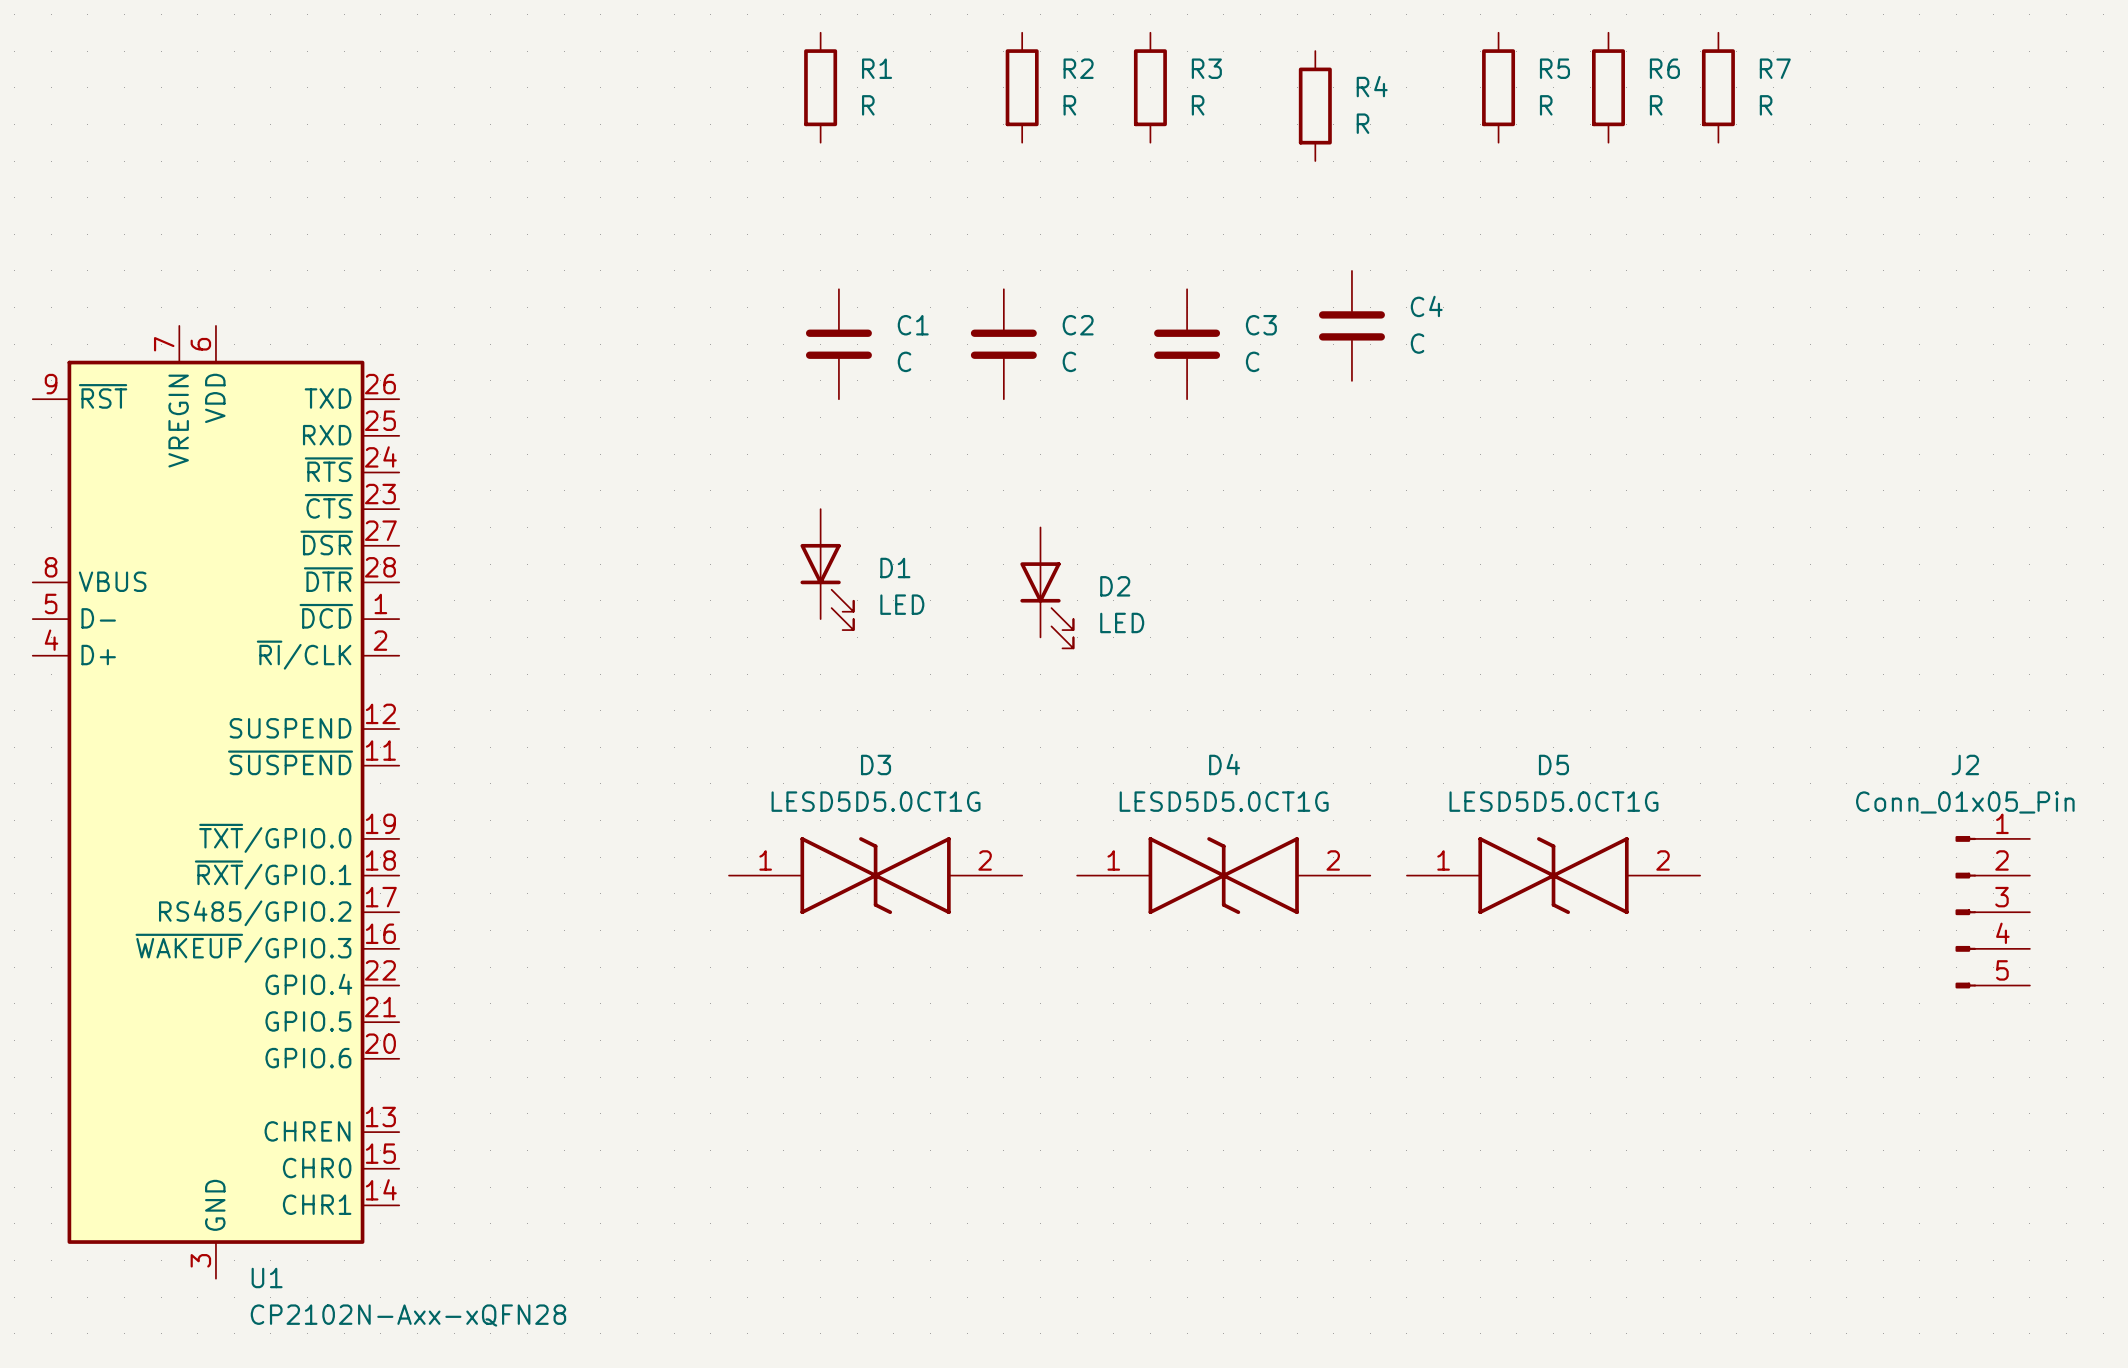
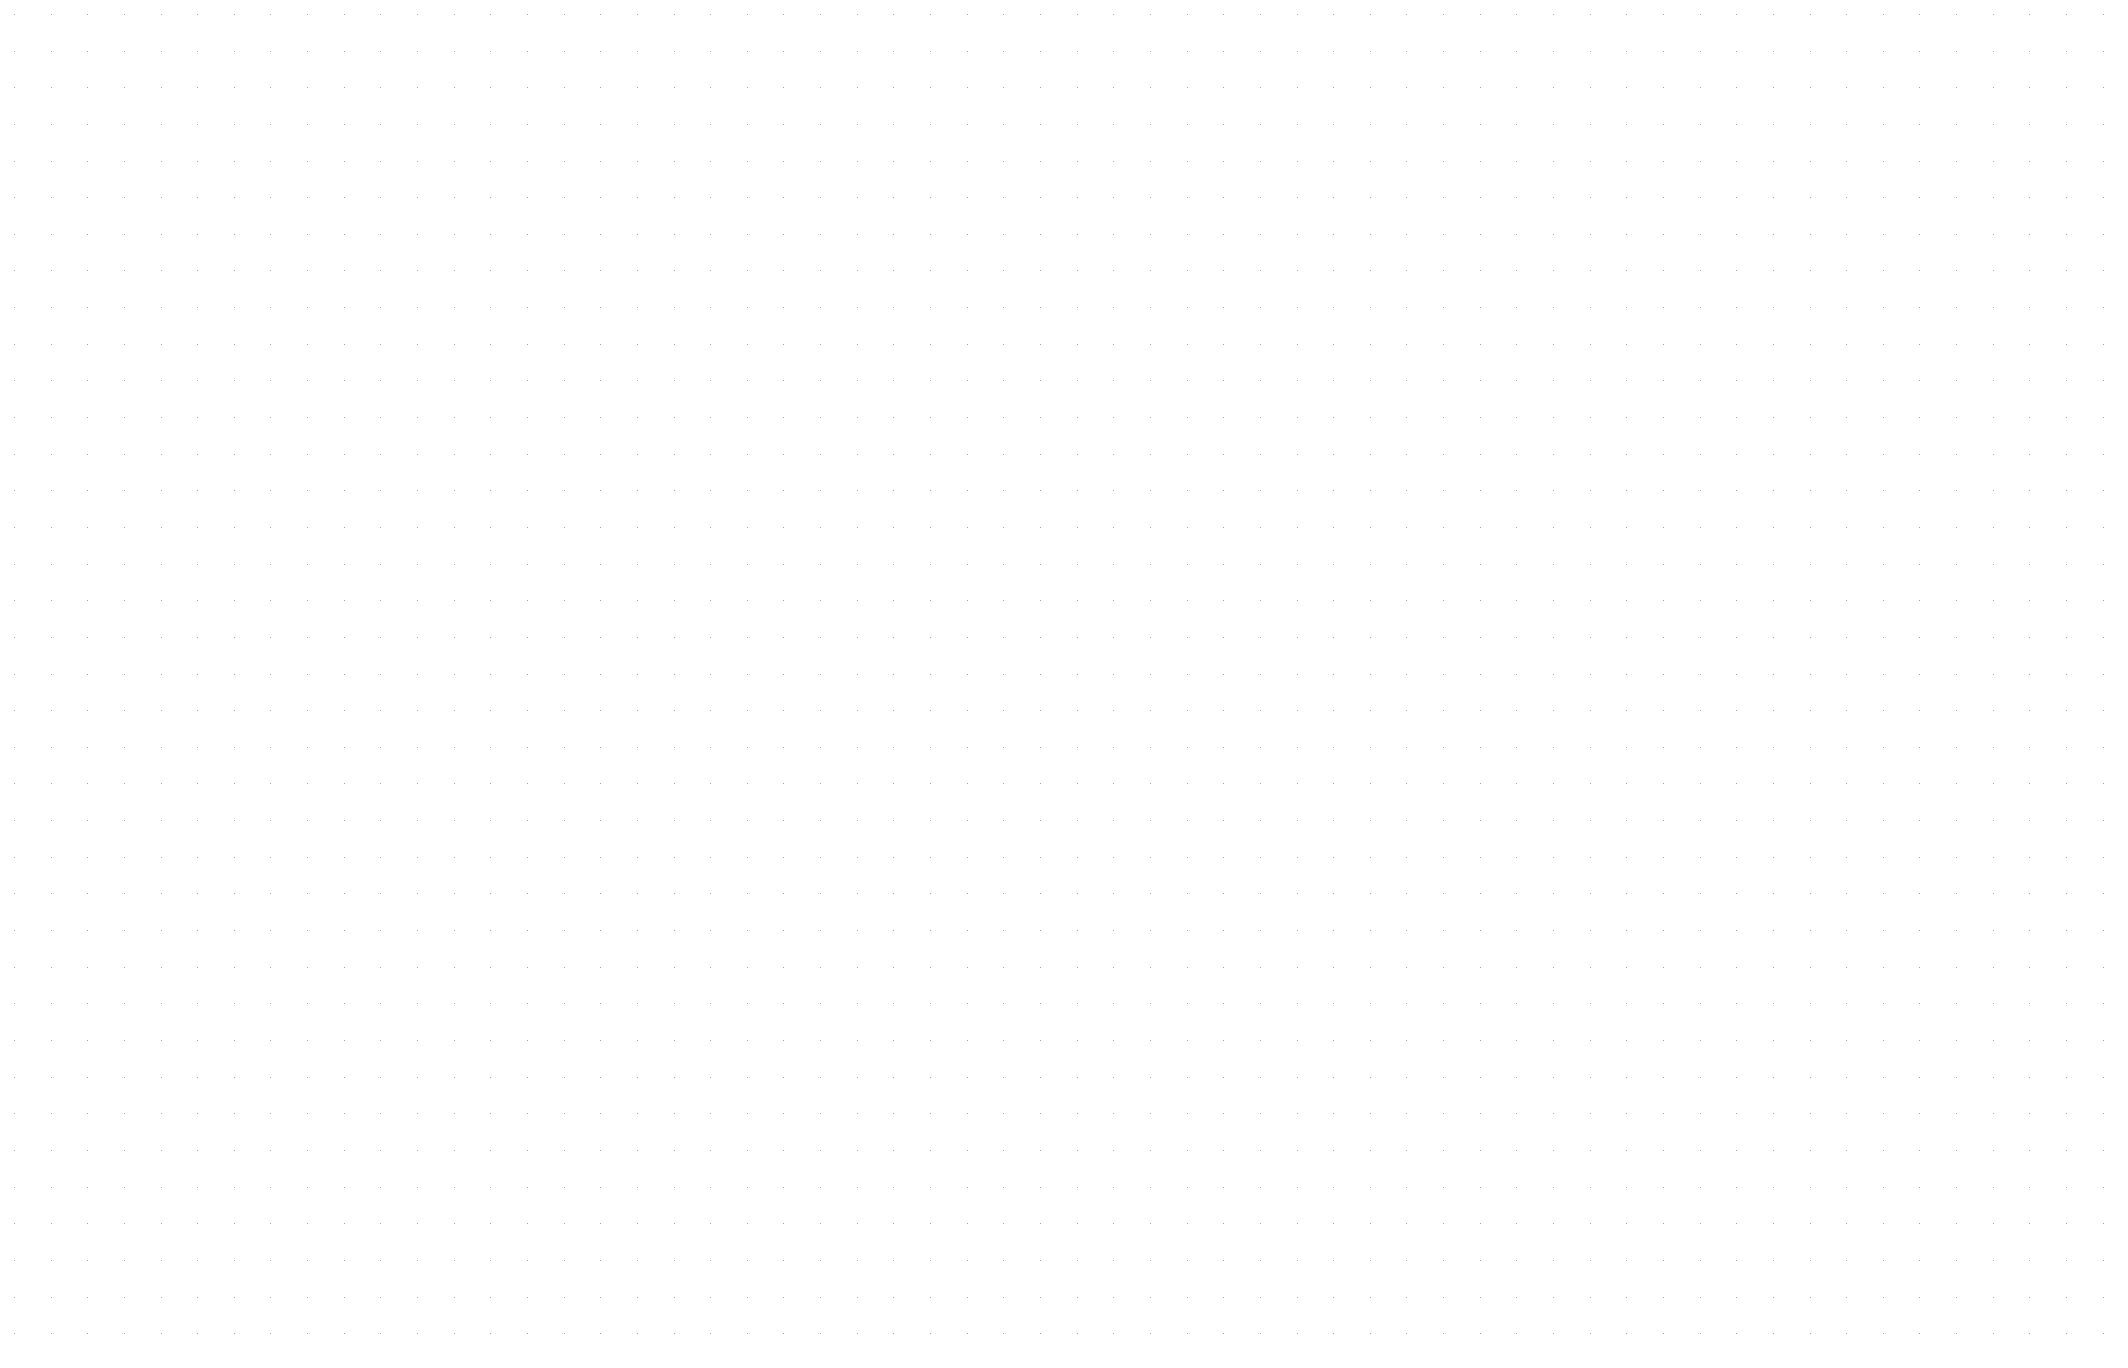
R1: R (820, 87) -> none
R2: R (1022, 87) -> none
R3: R (1150, 87) -> none
R5: R (1498, 87) -> none
R6: R (1608, 87) -> none
R7: R (1718, 87) -> none
R4: R (1315, 106) -> none
C4: C (1351, 325) -> none
C1: C (838, 344) -> none
C2: C (1003, 344) -> none
C3: C (1187, 344) -> none
D1: LED (827, 569) -> none
D2: LED (1046, 587) -> none
U1: CP2102N-Axx-xQFN28 (215, 802) -> none
D3: LESD5D5.0CT1G (875, 875) -> none
D4: LESD5D5.0CT1G (1223, 875) -> none
D5: LESD5D5.0CT1G (1553, 875) -> none
J2: Conn_01x05_Pin (1992, 912) -> none

